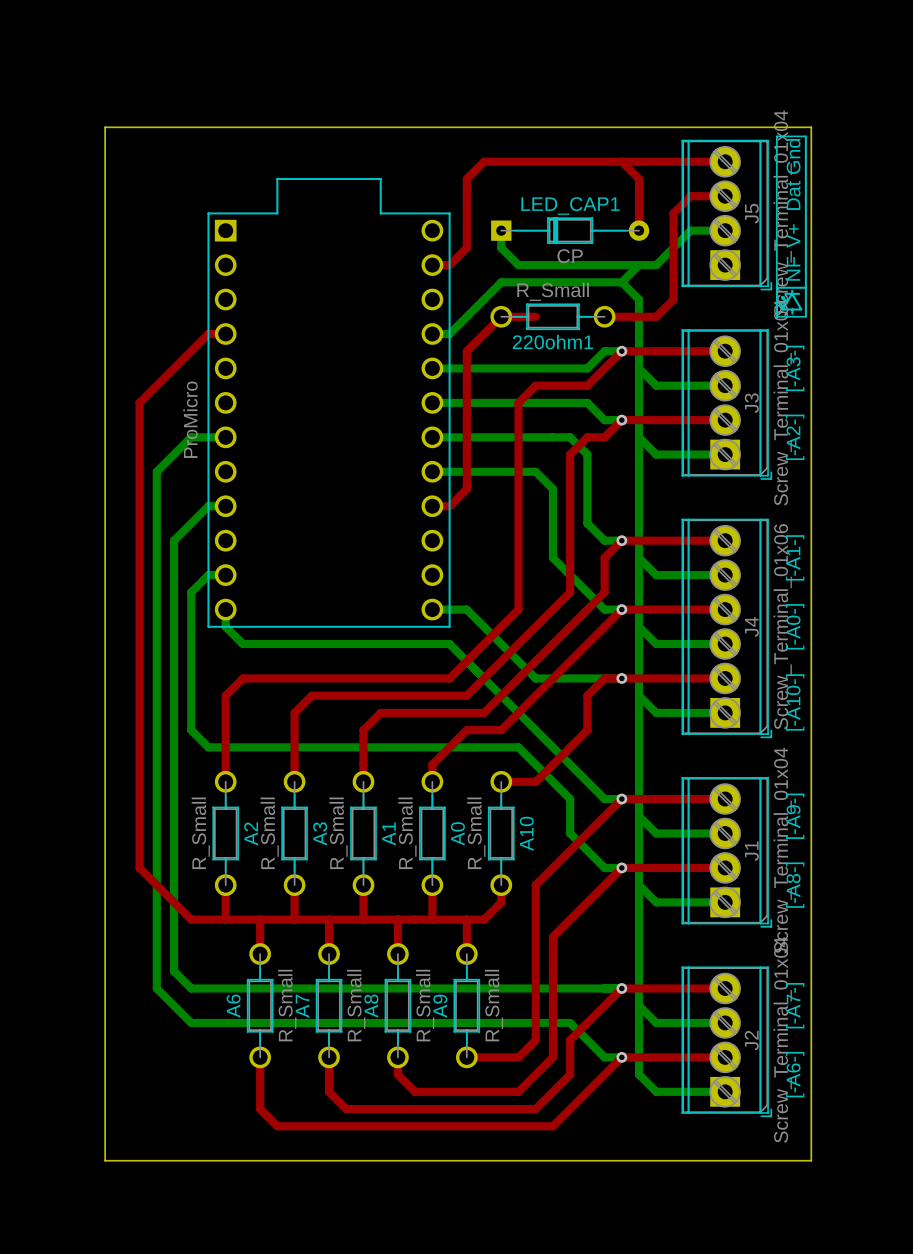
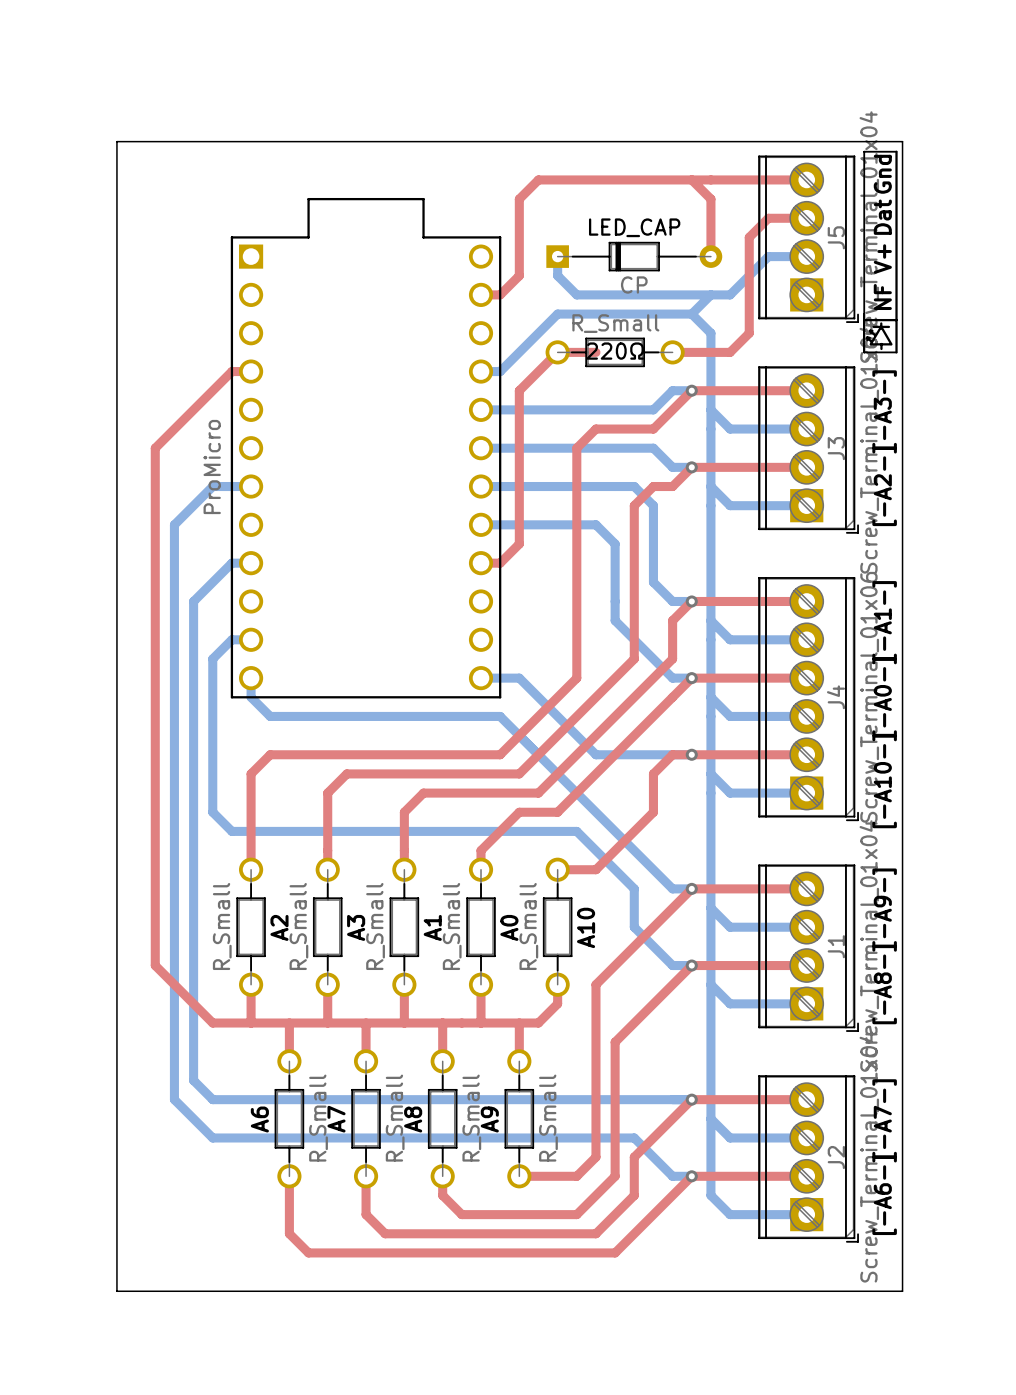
LED_CAP1 name: LED_CAP1 (570, 205) -> LED_CAP (634, 227)
220ohm1 name: 220ohm1 (552, 342) -> 220Ω (615, 351)

